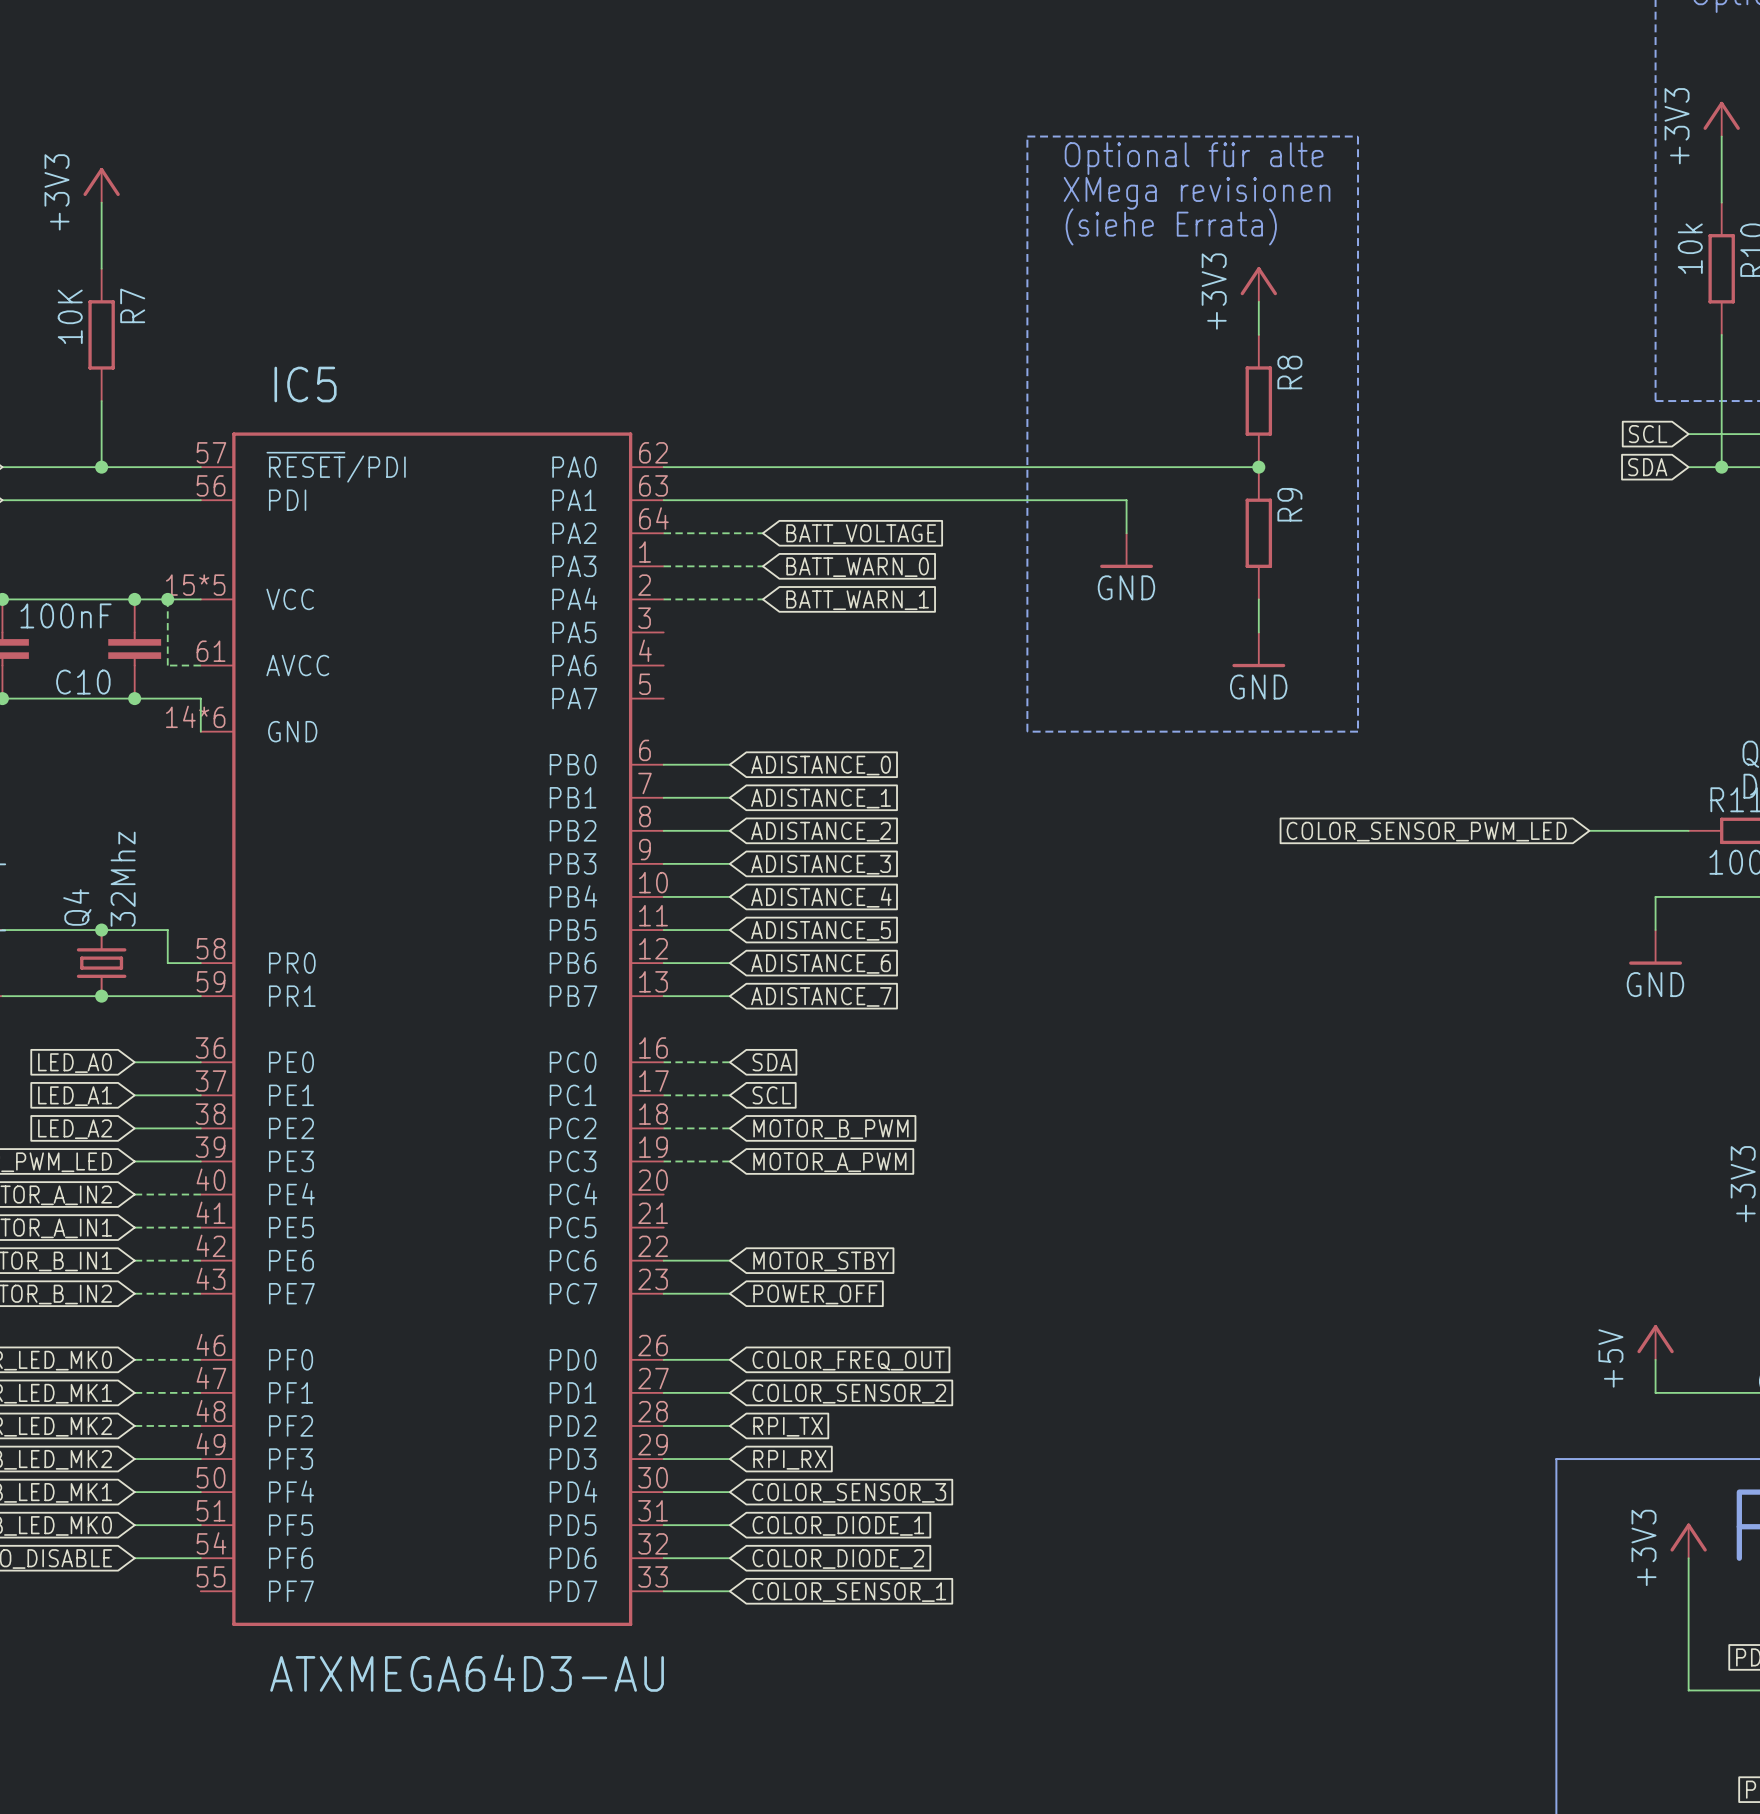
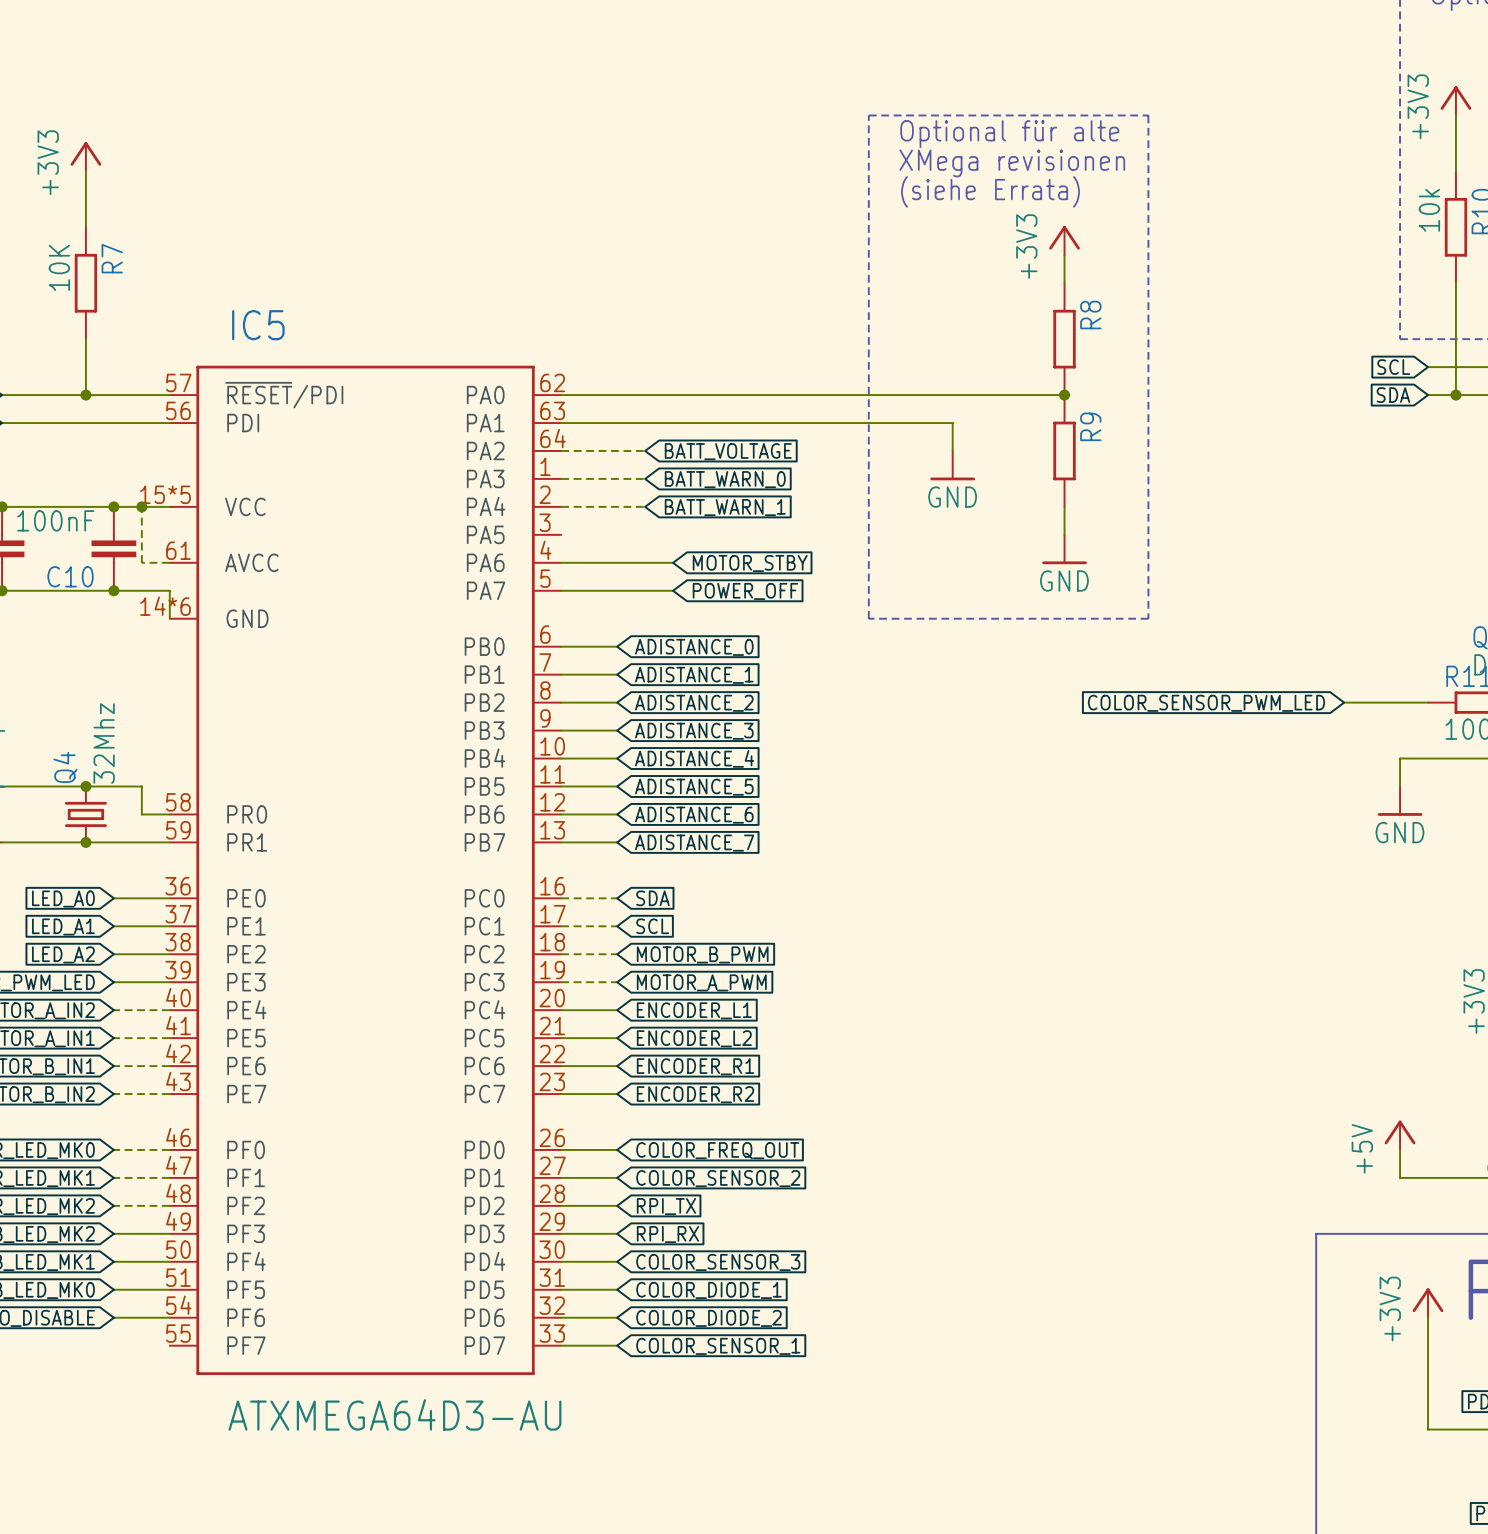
wire: none -> (561, 562) (673, 562)
global label: none -> MOTOR_STBY (750, 563)
wire: none -> (561, 590) (673, 590)
global label: none -> POWER_OFF (745, 591)
wire: none -> (561, 1010) (617, 1010)
global label: none -> ENCODER_L1 (694, 1010)
wire: none -> (561, 1038) (617, 1038)
global label: none -> ENCODER_L2 (694, 1038)
global label: MOTOR_STBY (821, 1261) -> ENCODER_R1 (695, 1066)
global label: POWER_OFF (815, 1294) -> ENCODER_R2 (695, 1094)

